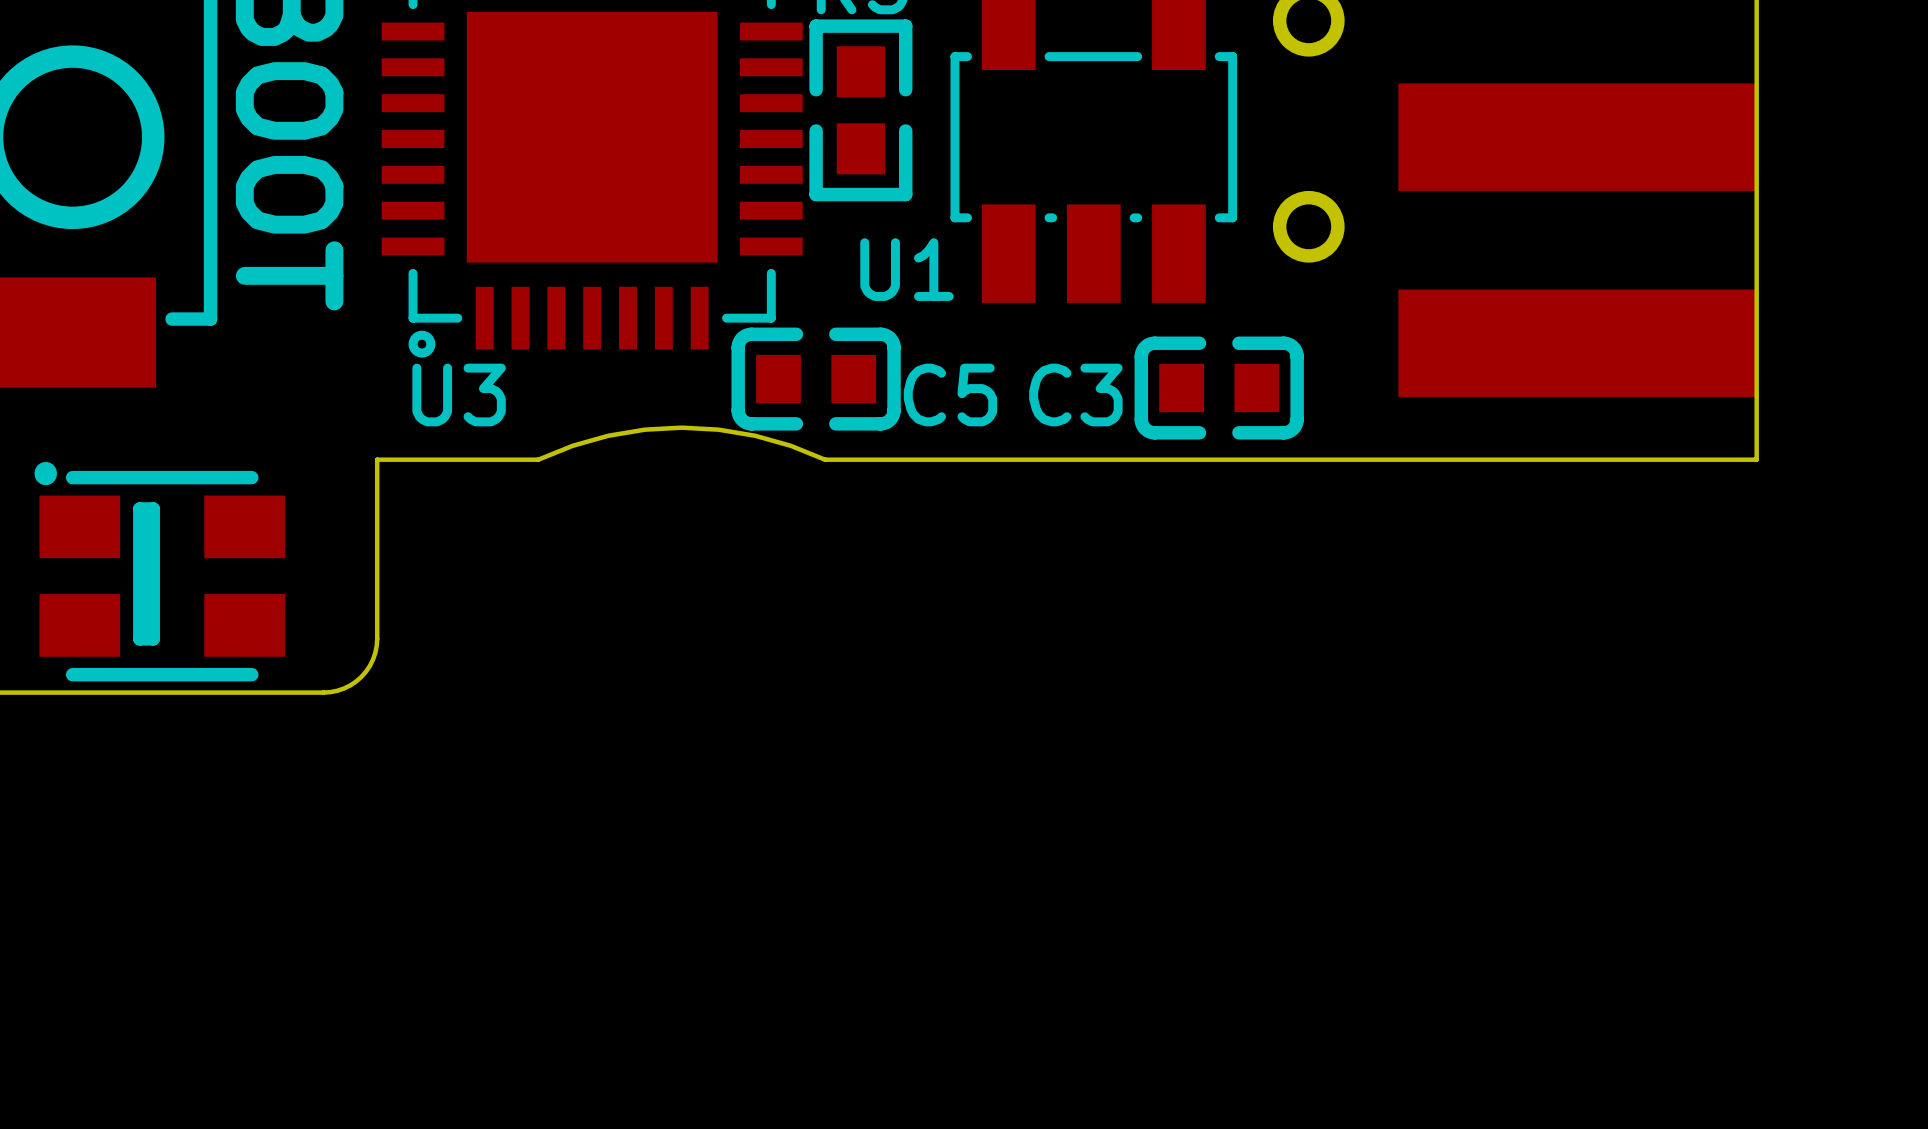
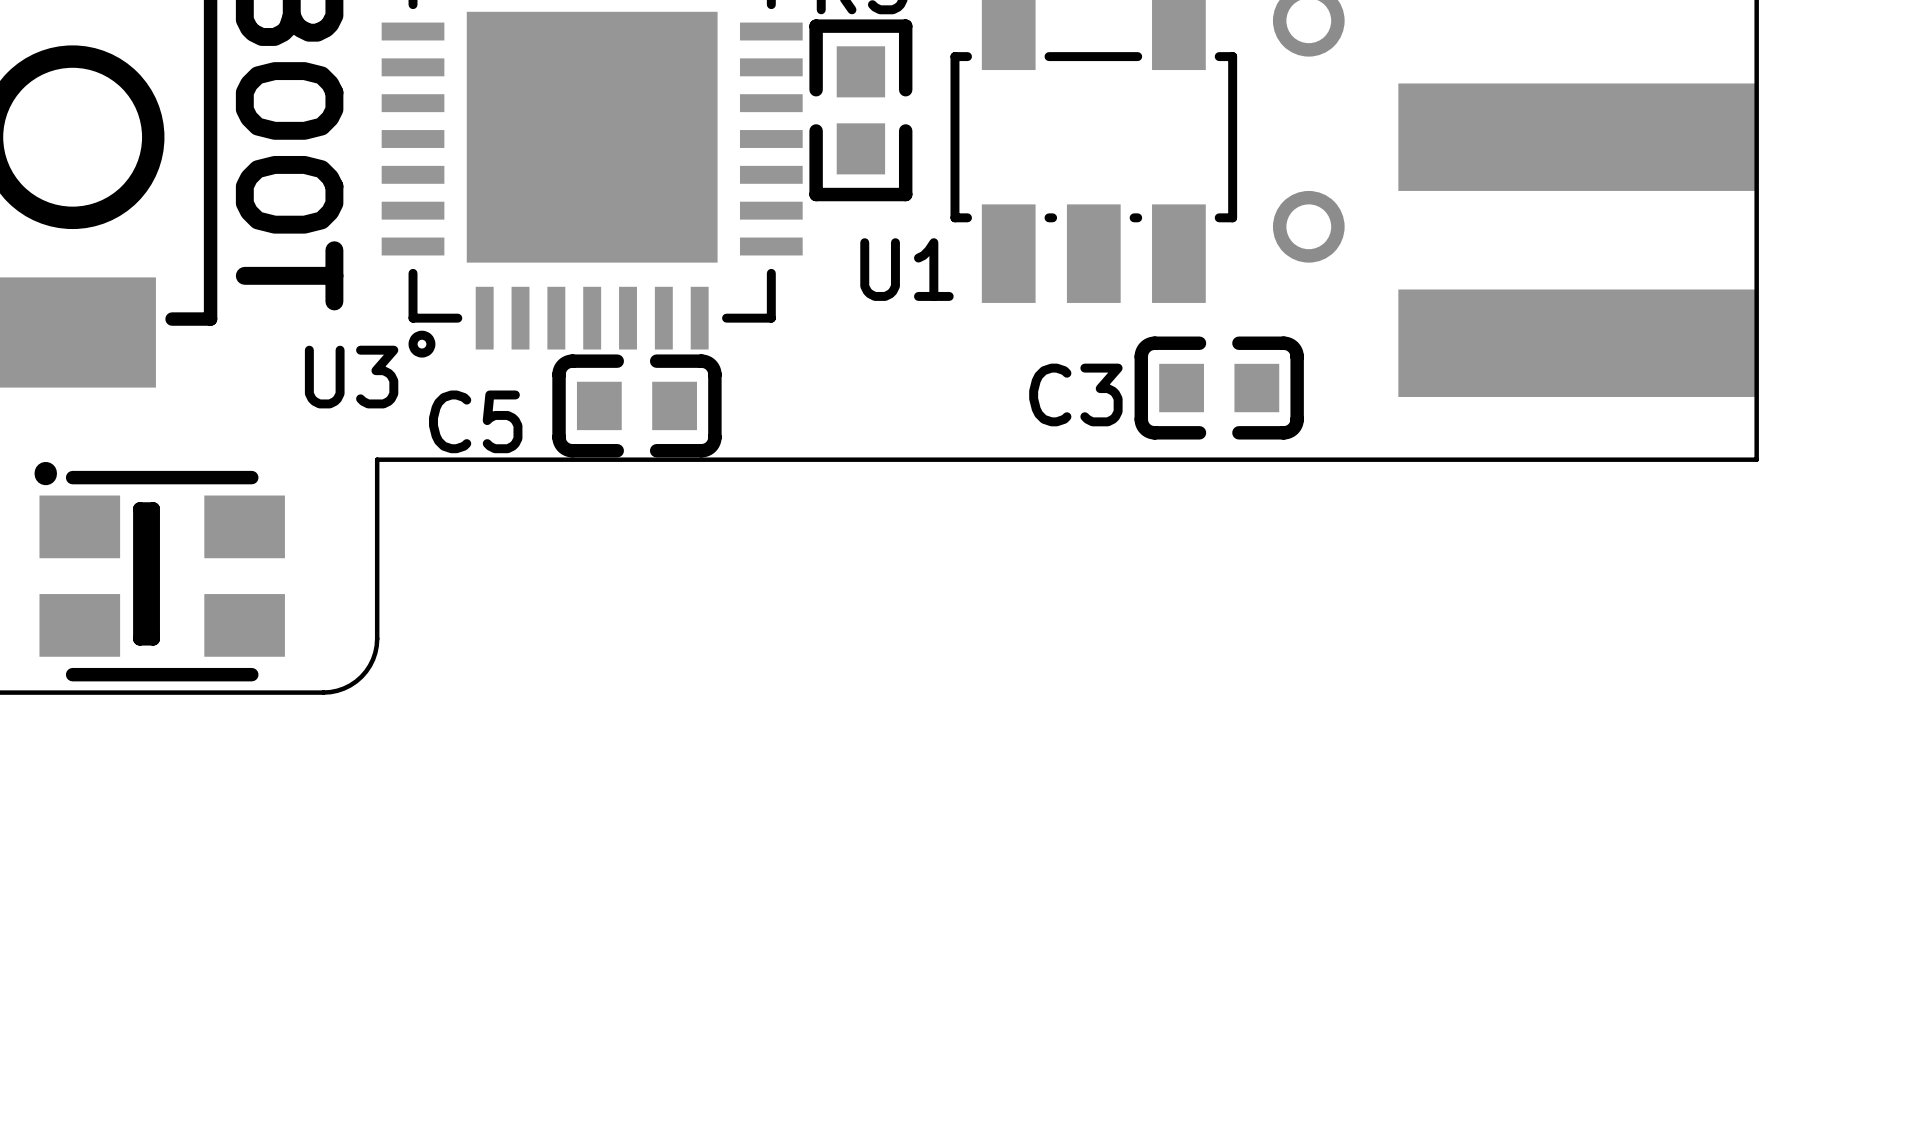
C5 position: (816, 379) -> (636, 405)
U3 name position: U3 (459, 394) -> U3 (351, 377)
C5 name position: C5 (950, 394) -> C5 (475, 421)
board edge: (538, 459) (572, 445) (608, 435) (644, 429) (681, 427) (718, 429) (755, 435) (790, 445) (825, 459) -> (538, 459) (825, 459)

